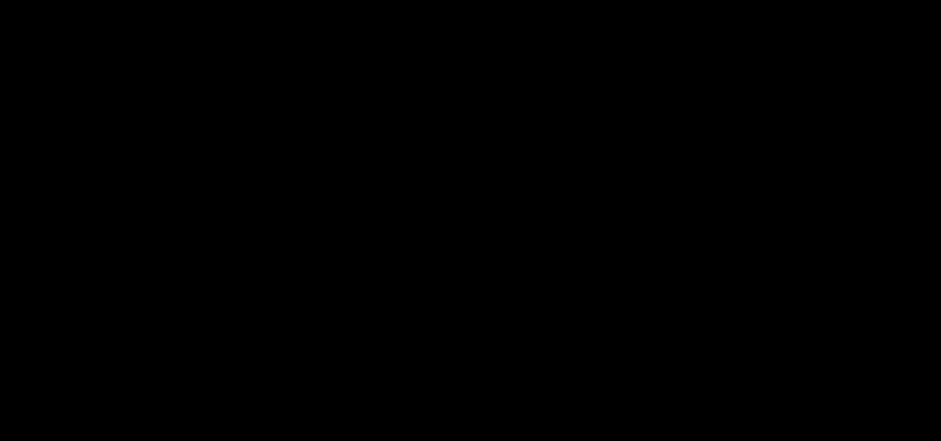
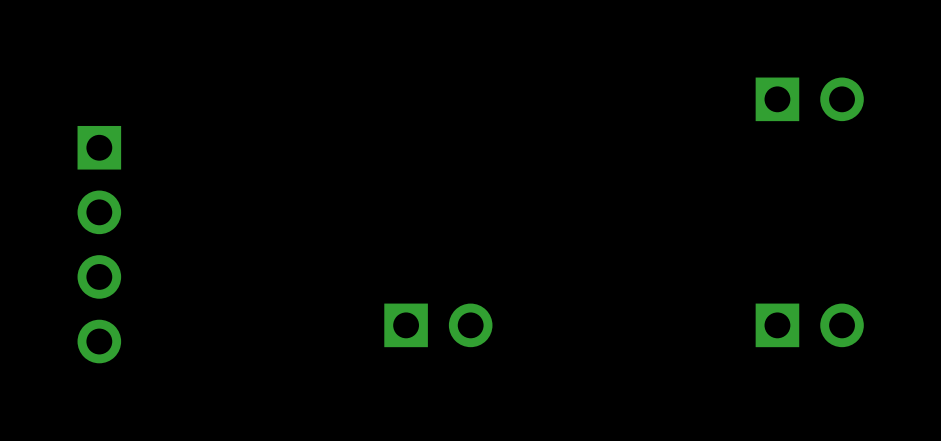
part: none -> (809, 99)
part: none -> (99, 244)
part: none -> (438, 325)
part: none -> (809, 325)

